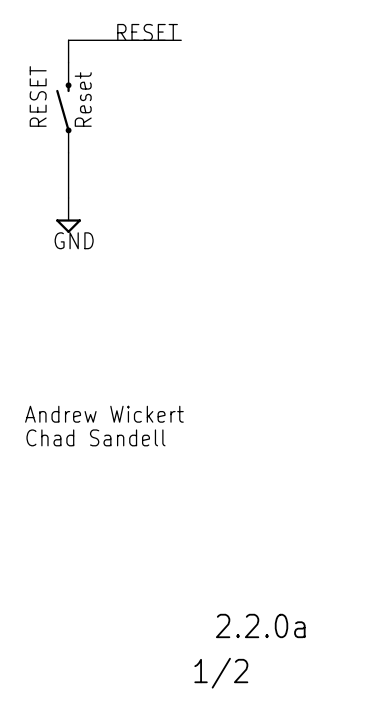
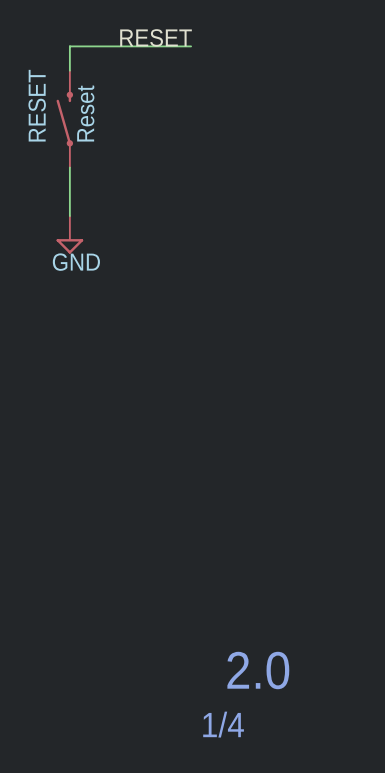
text: Andrew Wickert (104, 414) -> none
text: Chad Sandell (95, 437) -> none
text: 2.2.0a (260, 625) -> 2.0 (258, 670)
text: 1/2 (221, 673) -> 1/4 (223, 724)

